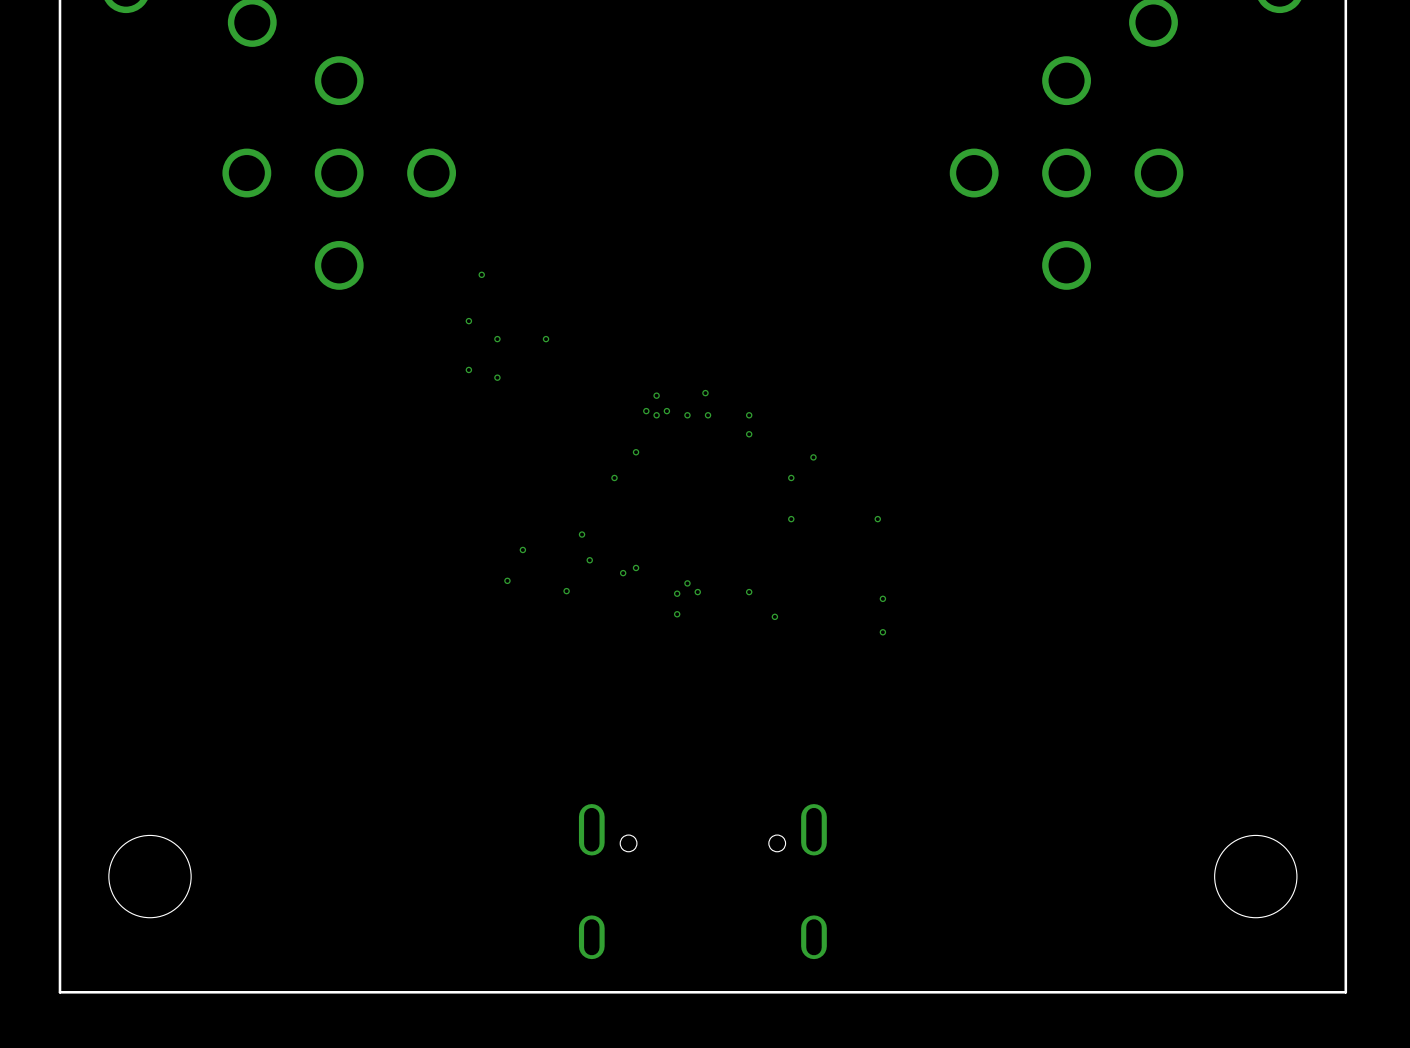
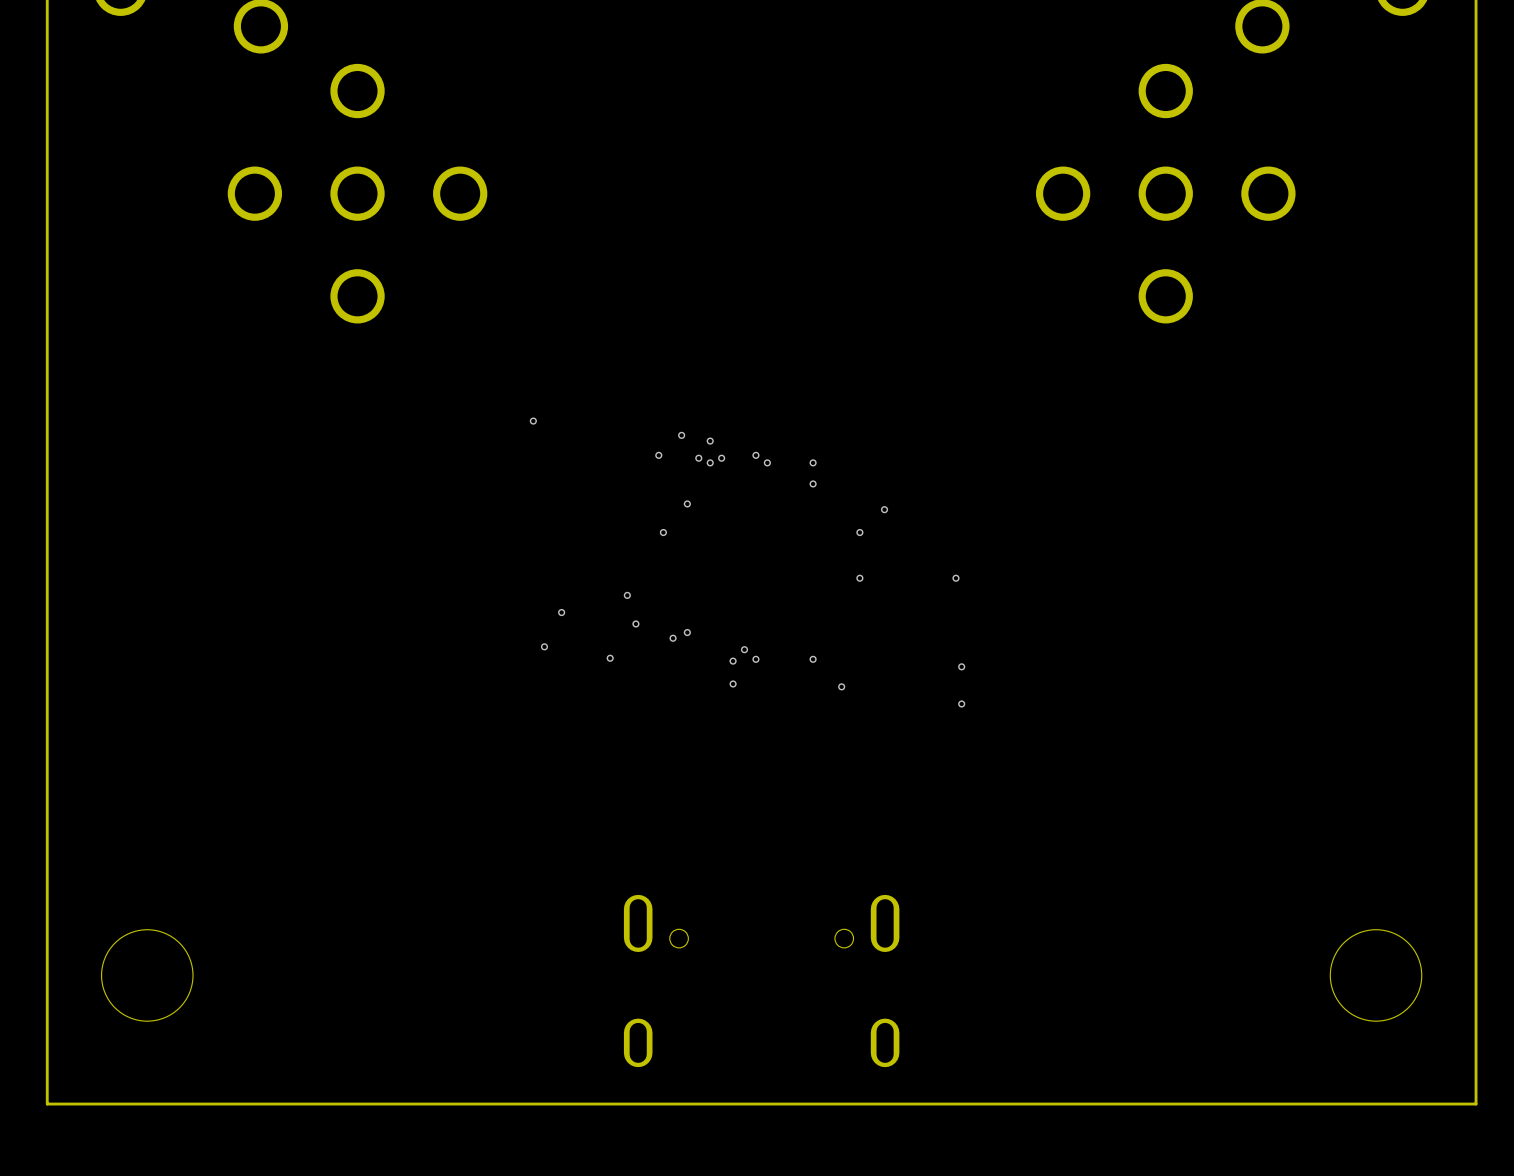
via: (481, 274) -> none
via: (468, 321) -> none
via: (497, 339) -> none
via: (546, 339) -> none
via: (468, 369) -> none
via: none -> (681, 435)
via: (705, 393) -> none
via: none -> (658, 455)
via: none -> (755, 455)
via: (687, 415) -> none

